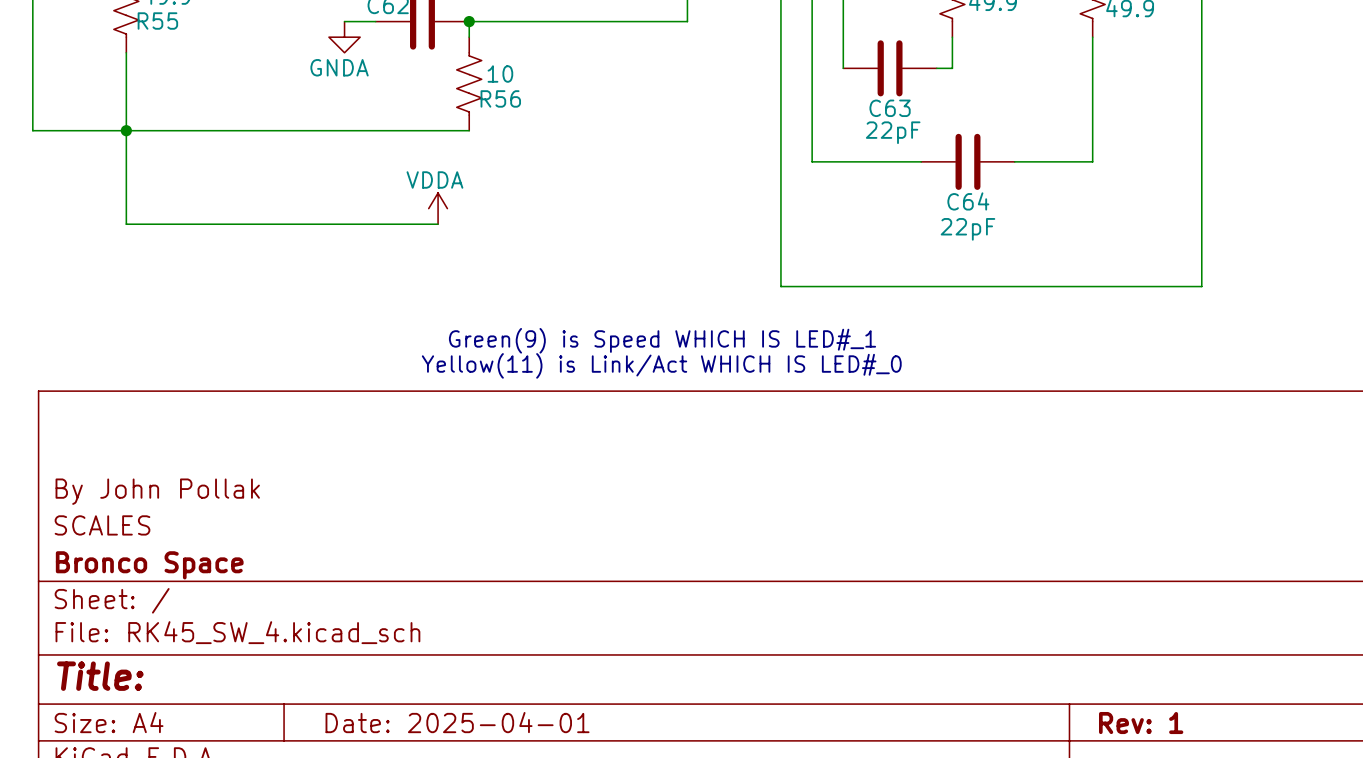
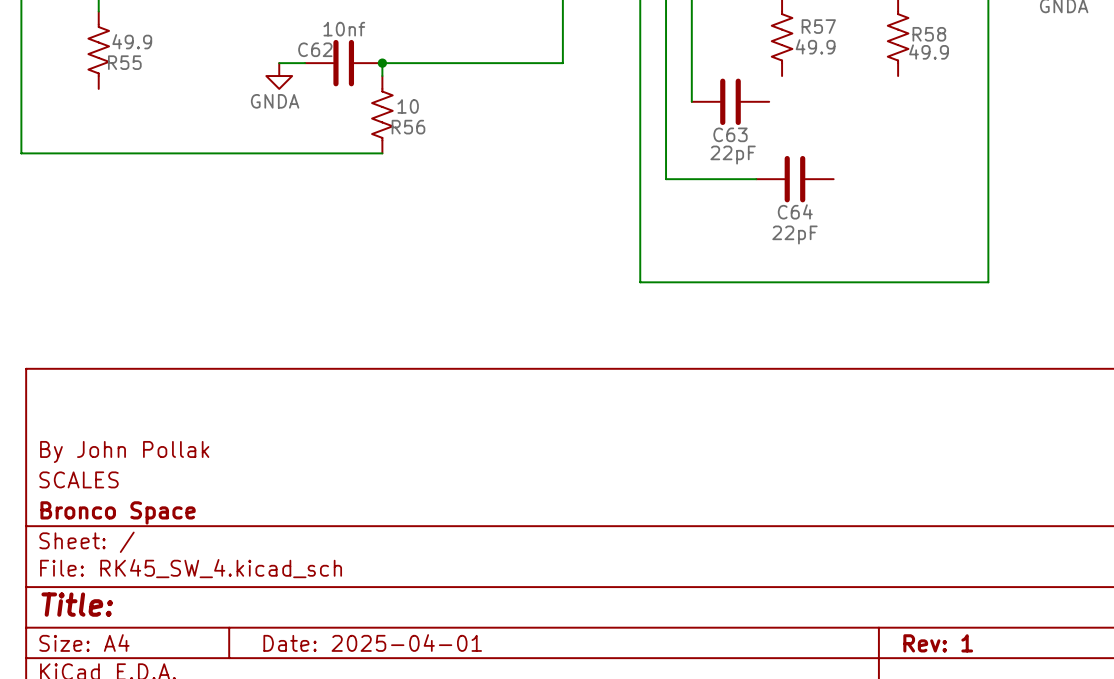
wire: (952, 37) (952, 68) (936, 68) -> none
wire: (1092, 37) (1092, 161) (1014, 161) -> none
wire: (126, 52) (126, 224) (438, 224) -> none
junction: (126, 130) -> none
power symbol: VDDA (438, 208) -> none
text: Green(9) is Speed WHICH IS LED#_1 (662, 340) -> none
text: Yellow(11) is Link/Act WHICH IS LED#_0 (661, 365) -> none

